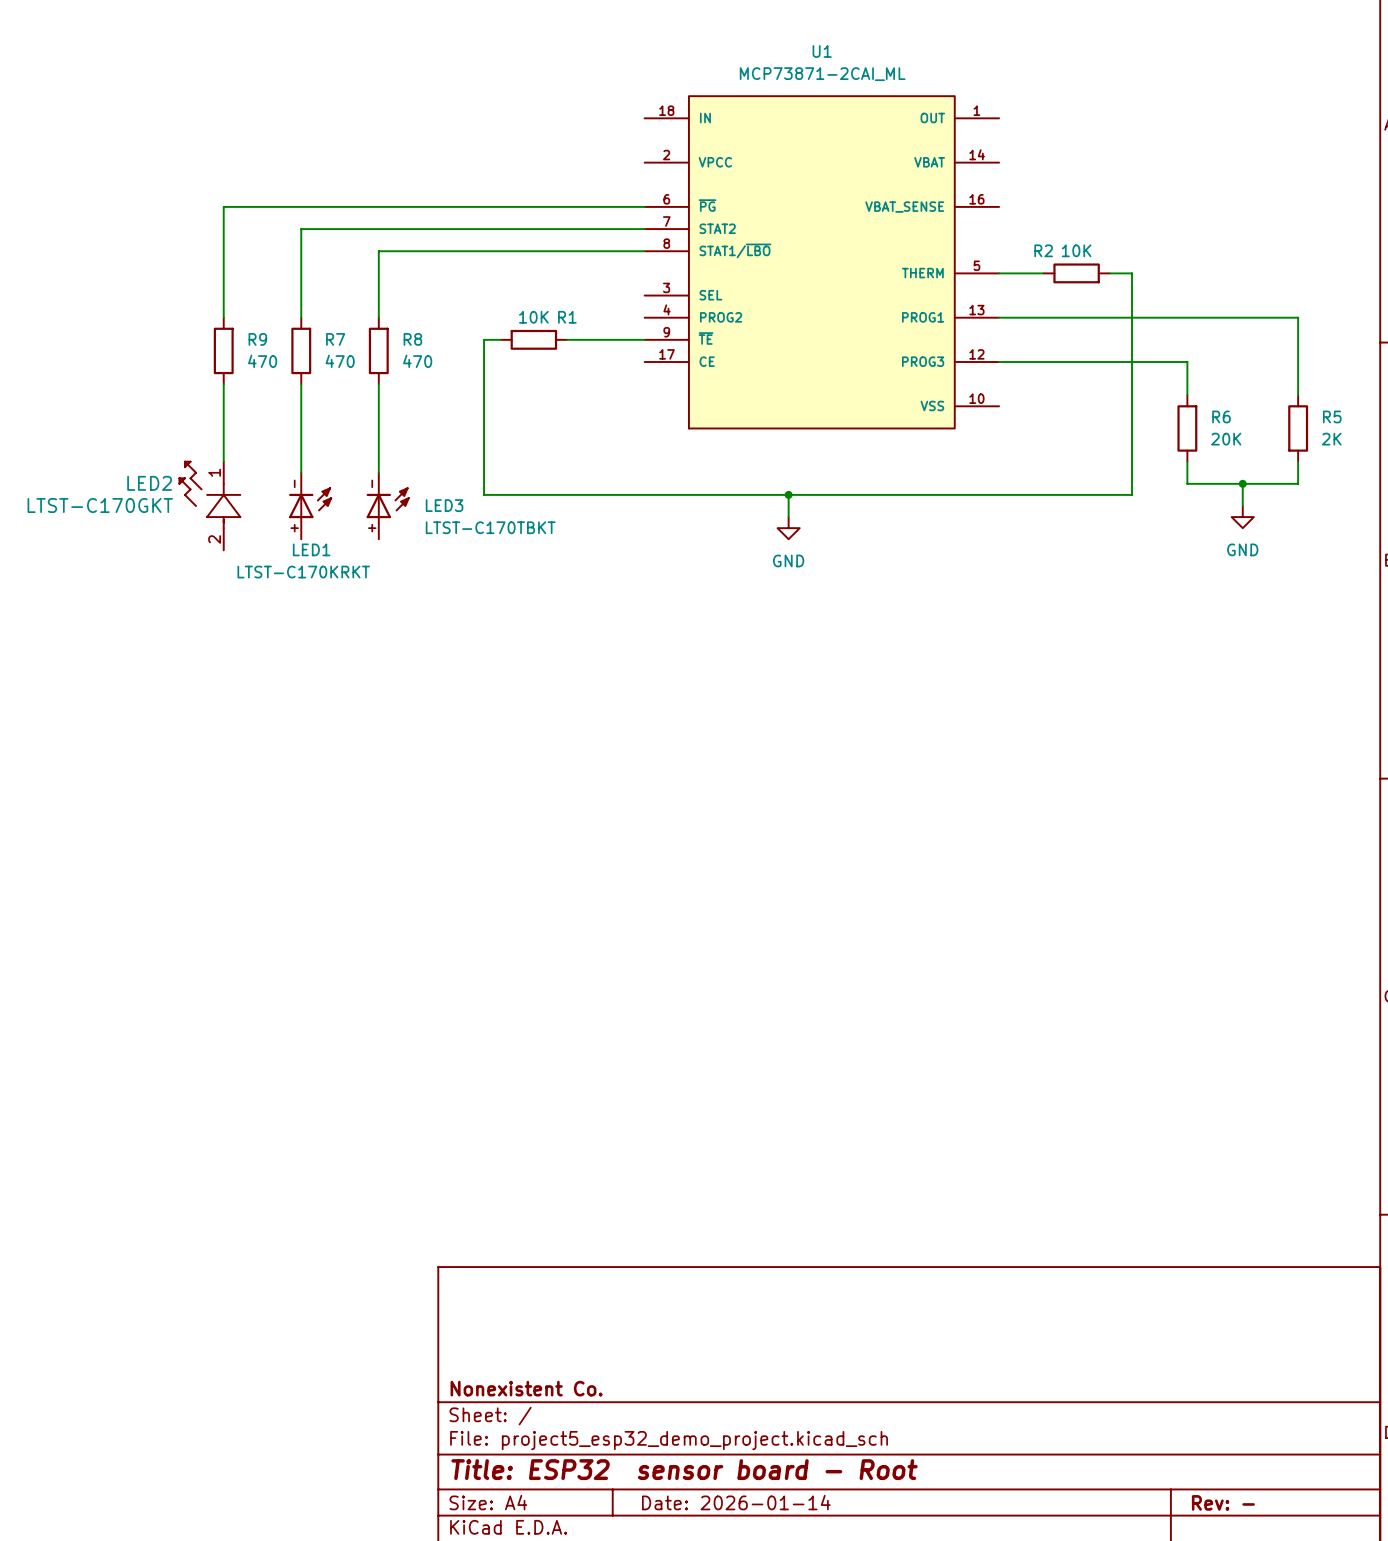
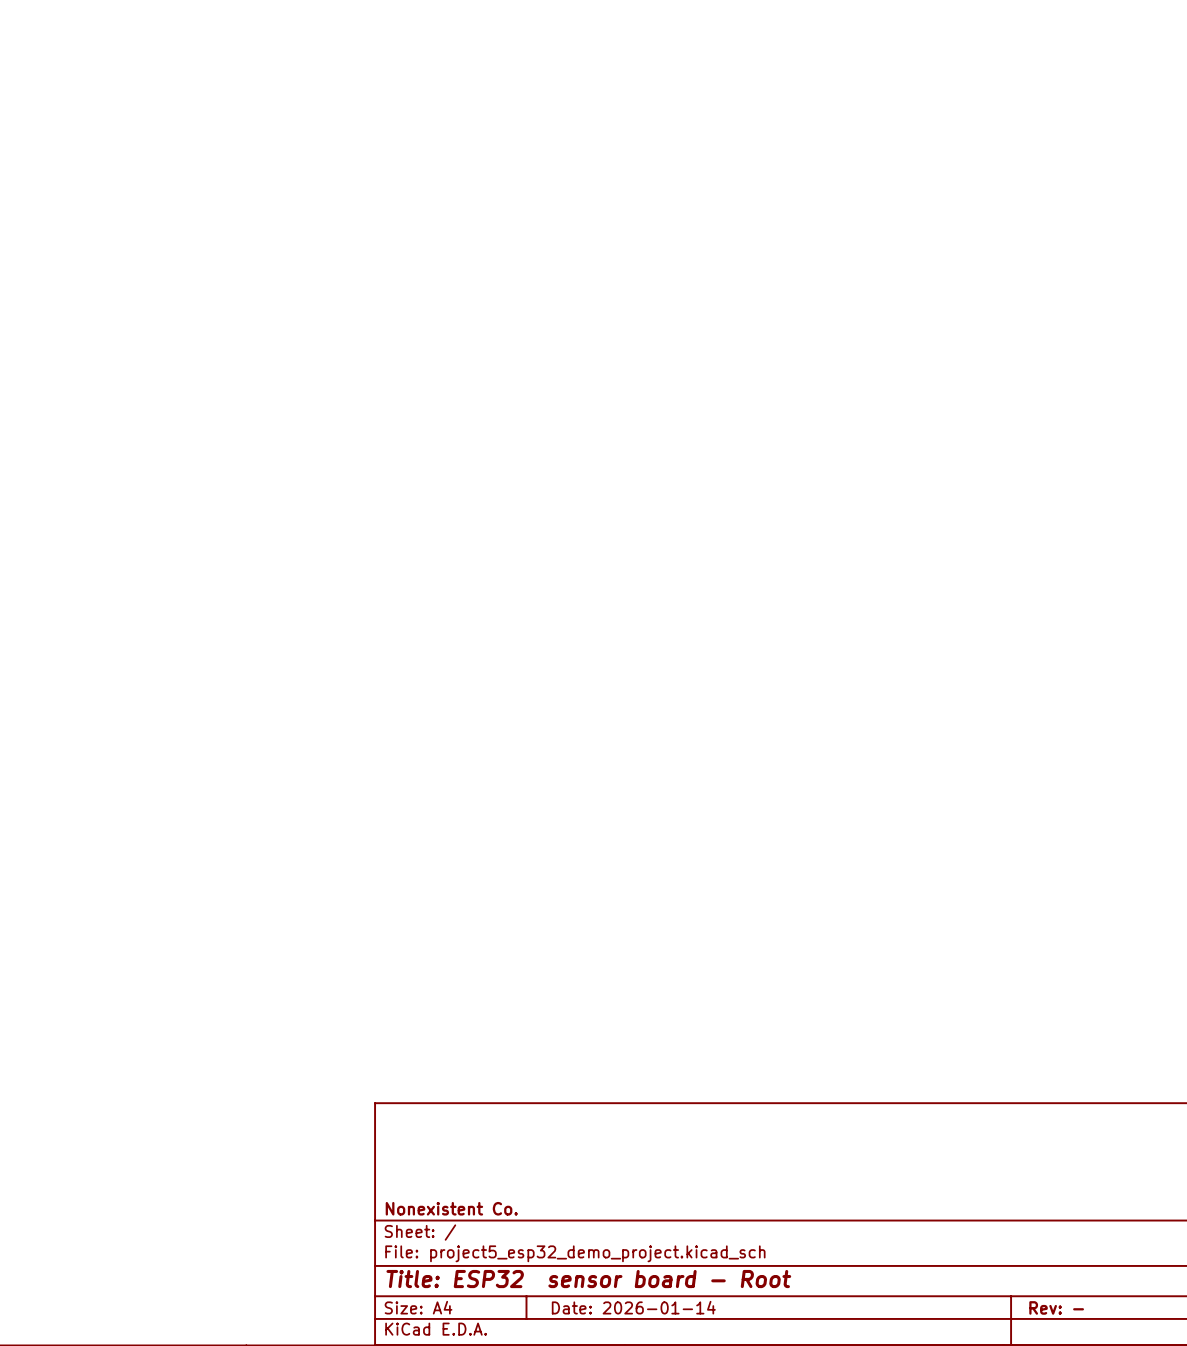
wire: (644, 206) (223, 206) (223, 317) -> none
wire: (644, 229) (301, 229) (301, 317) -> none
wire: (644, 251) (378, 251) (378, 317) -> none
U1: MCP73871-2CAI_ML (821, 262) -> none
wire: (999, 273) (1043, 273) -> none
R2: 10K (1076, 273) -> none
wire: (1109, 273) (1132, 273) (1132, 494) (484, 494) (484, 339) (500, 339) -> none
wire: (999, 317) (1298, 317) (1298, 395) -> none
R1: 10K (533, 339) -> none
wire: (567, 339) (644, 339) -> none
R9: 470 (223, 350) -> none
R7: 470 (301, 350) -> none
R8: 470 (378, 350) -> none
wire: (999, 362) (1187, 362) (1187, 395) -> none
wire: (223, 384) (223, 461) -> none
wire: (301, 384) (301, 472) -> none
wire: (378, 384) (378, 472) -> none
R6: 20K (1187, 428) -> none
R5: 2K (1298, 428) -> none
wire: (1187, 461) (1187, 483) (1298, 483) (1298, 461) -> none
wire: (1242, 483) (1242, 506) -> none
junction: (1242, 483) -> none
wire: (788, 494) (788, 517) -> none
junction: (788, 494) -> none
LED2: LTST-C170GKT (209, 505) -> none
LED1: LTST-C170KRKT (310, 506) -> none
LED3: LTST-C170TBKT (388, 506) -> none
power symbol: GND (1242, 517) -> none
power symbol: GND (788, 528) -> none

